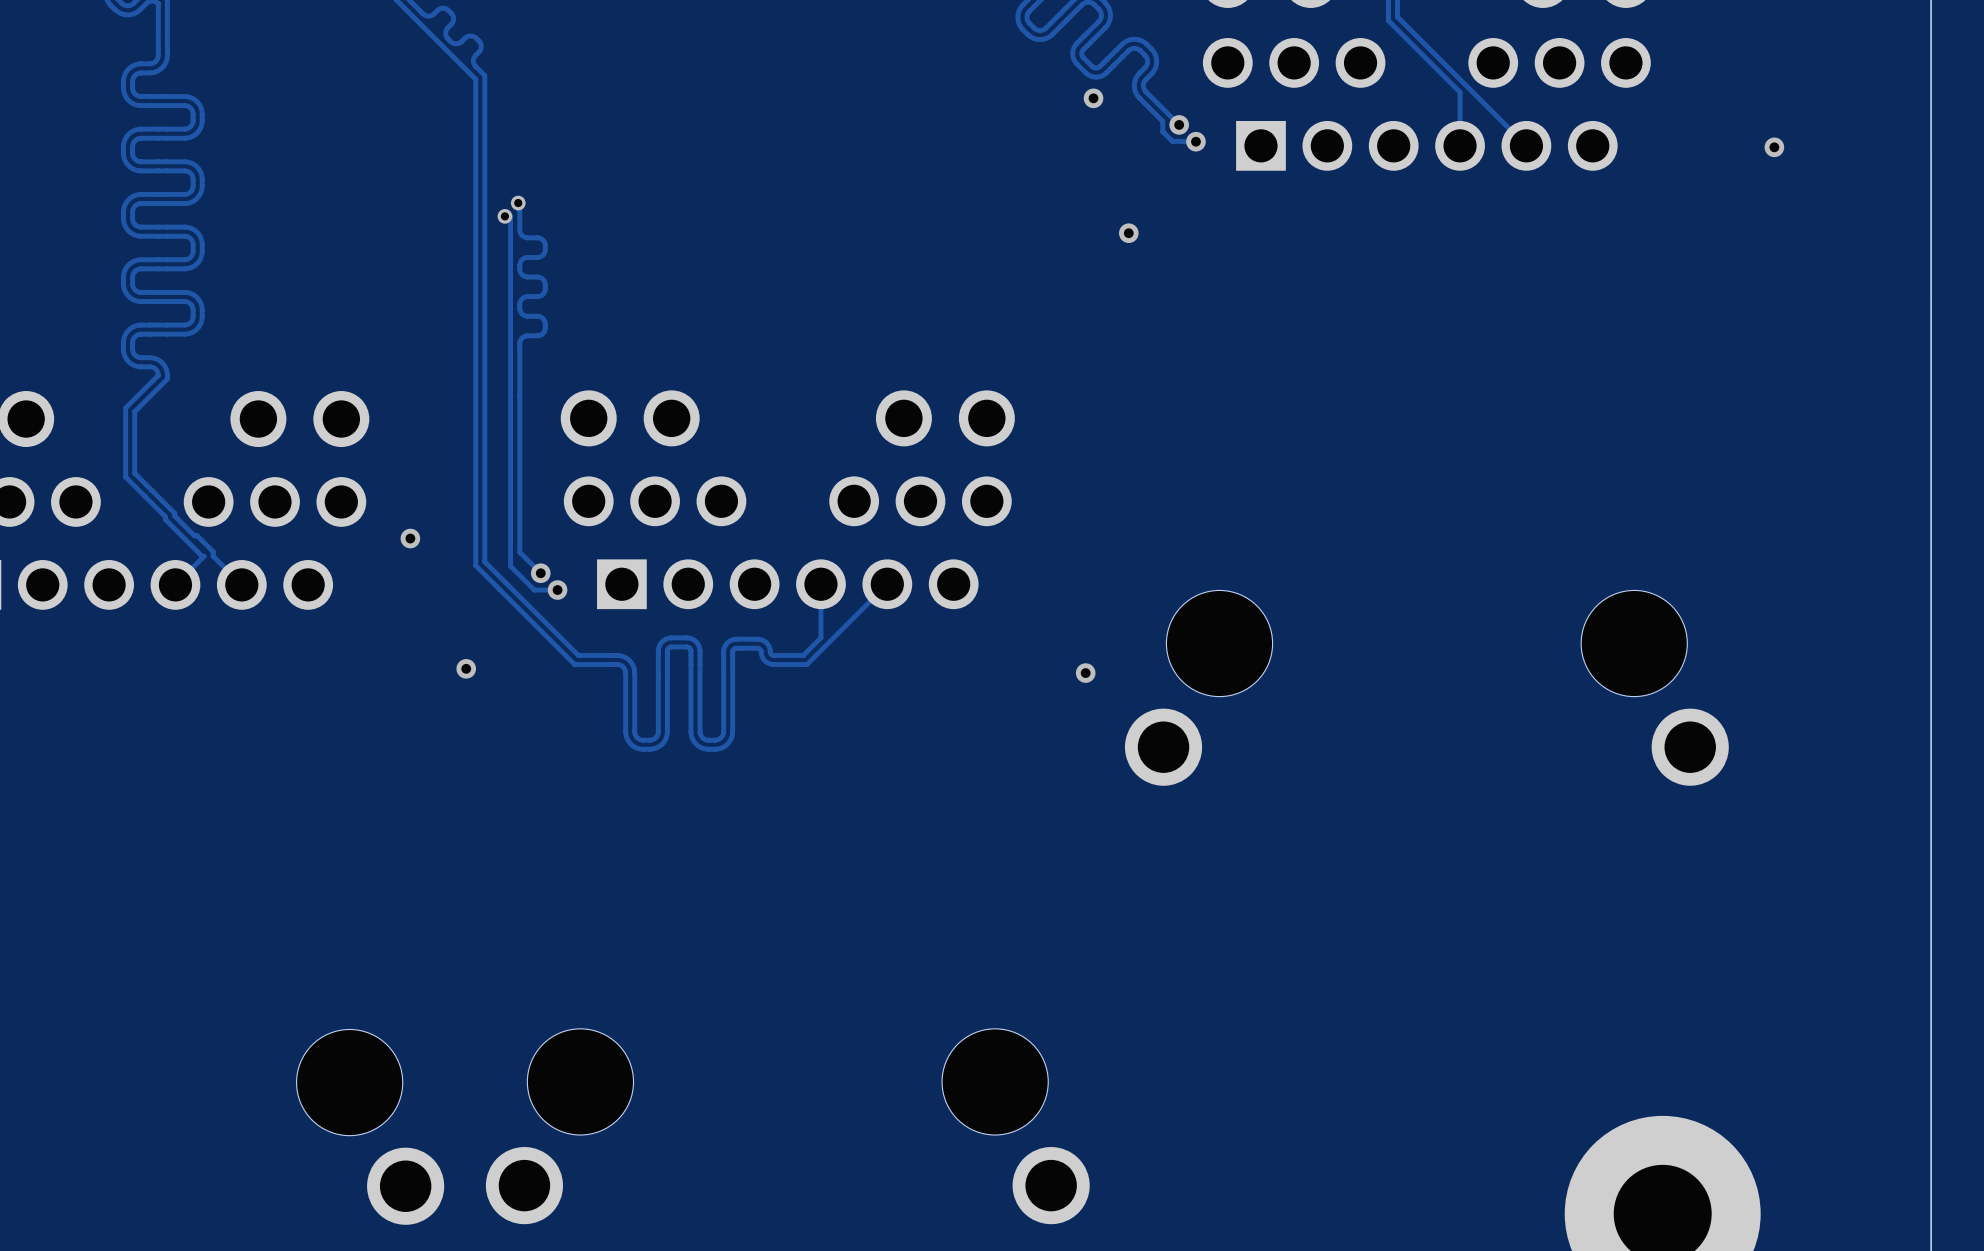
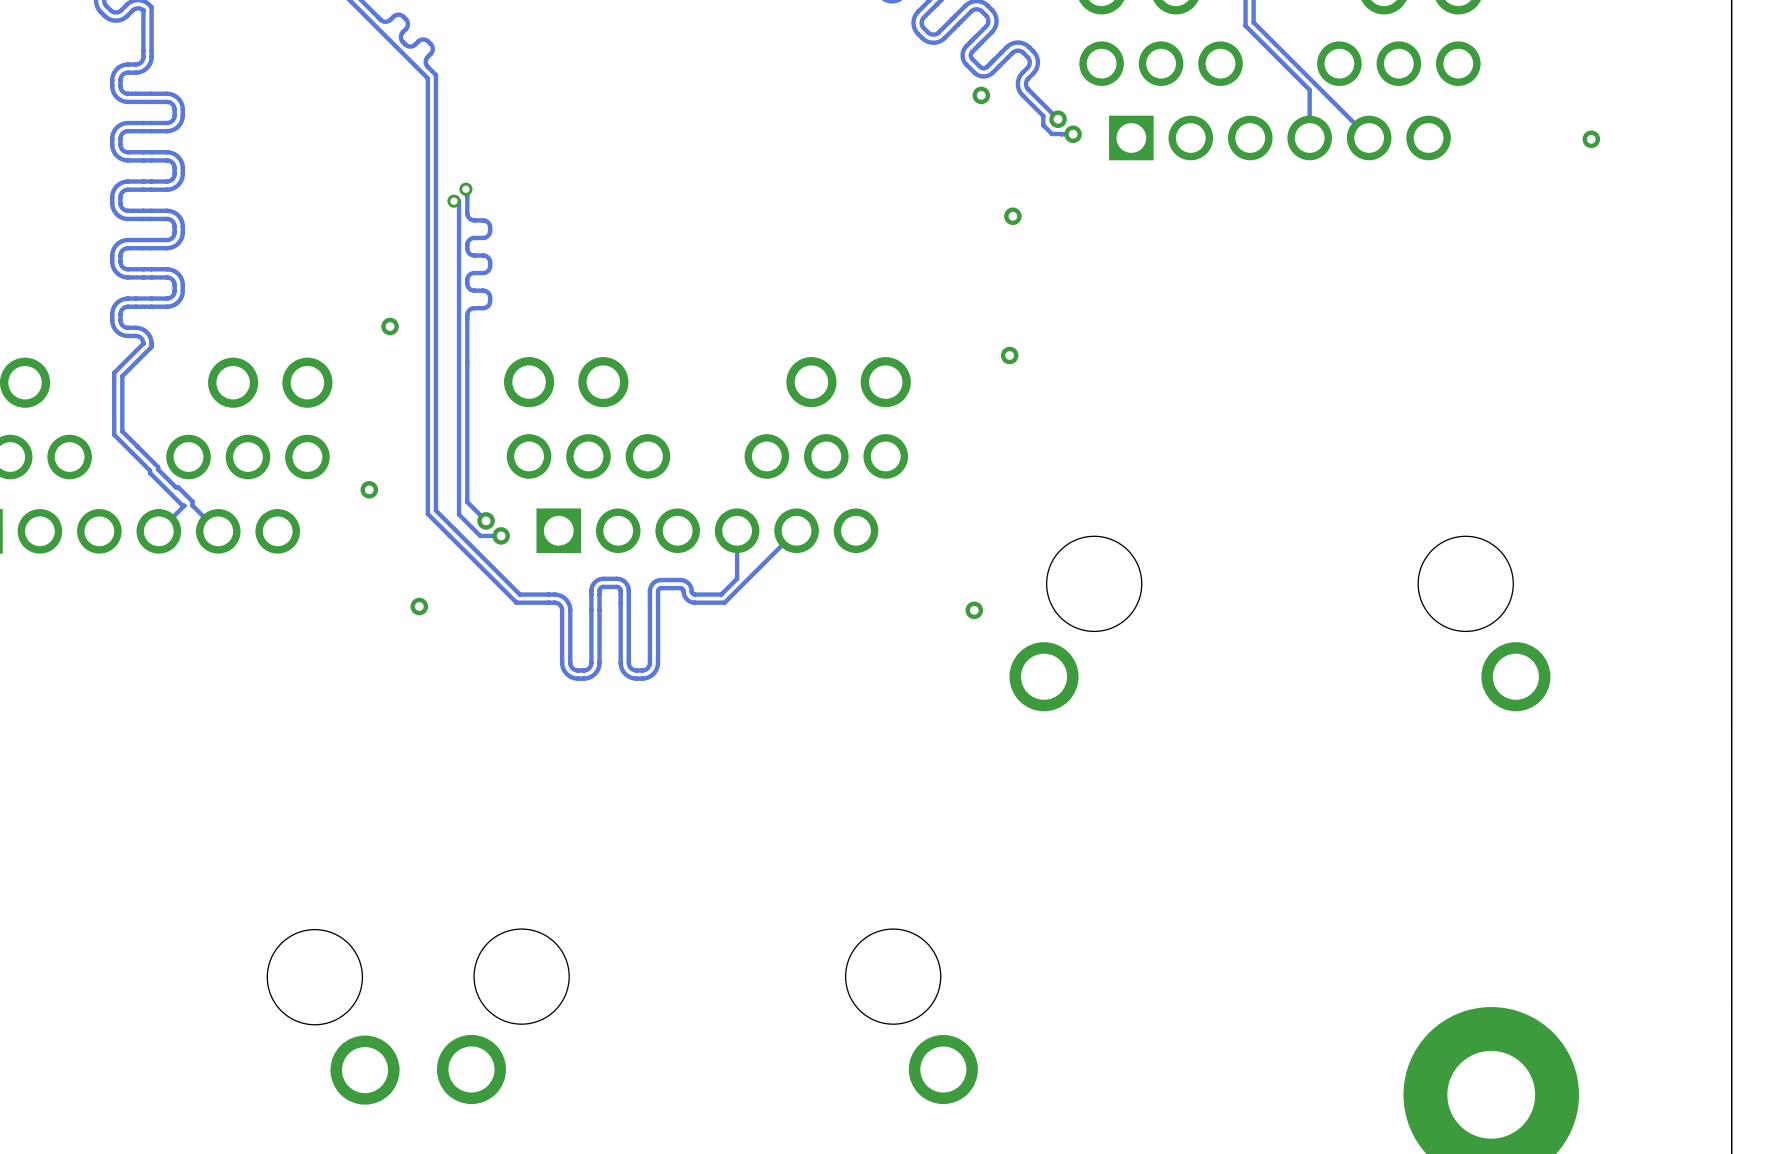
via: none -> (390, 326)
via: none -> (1009, 355)

